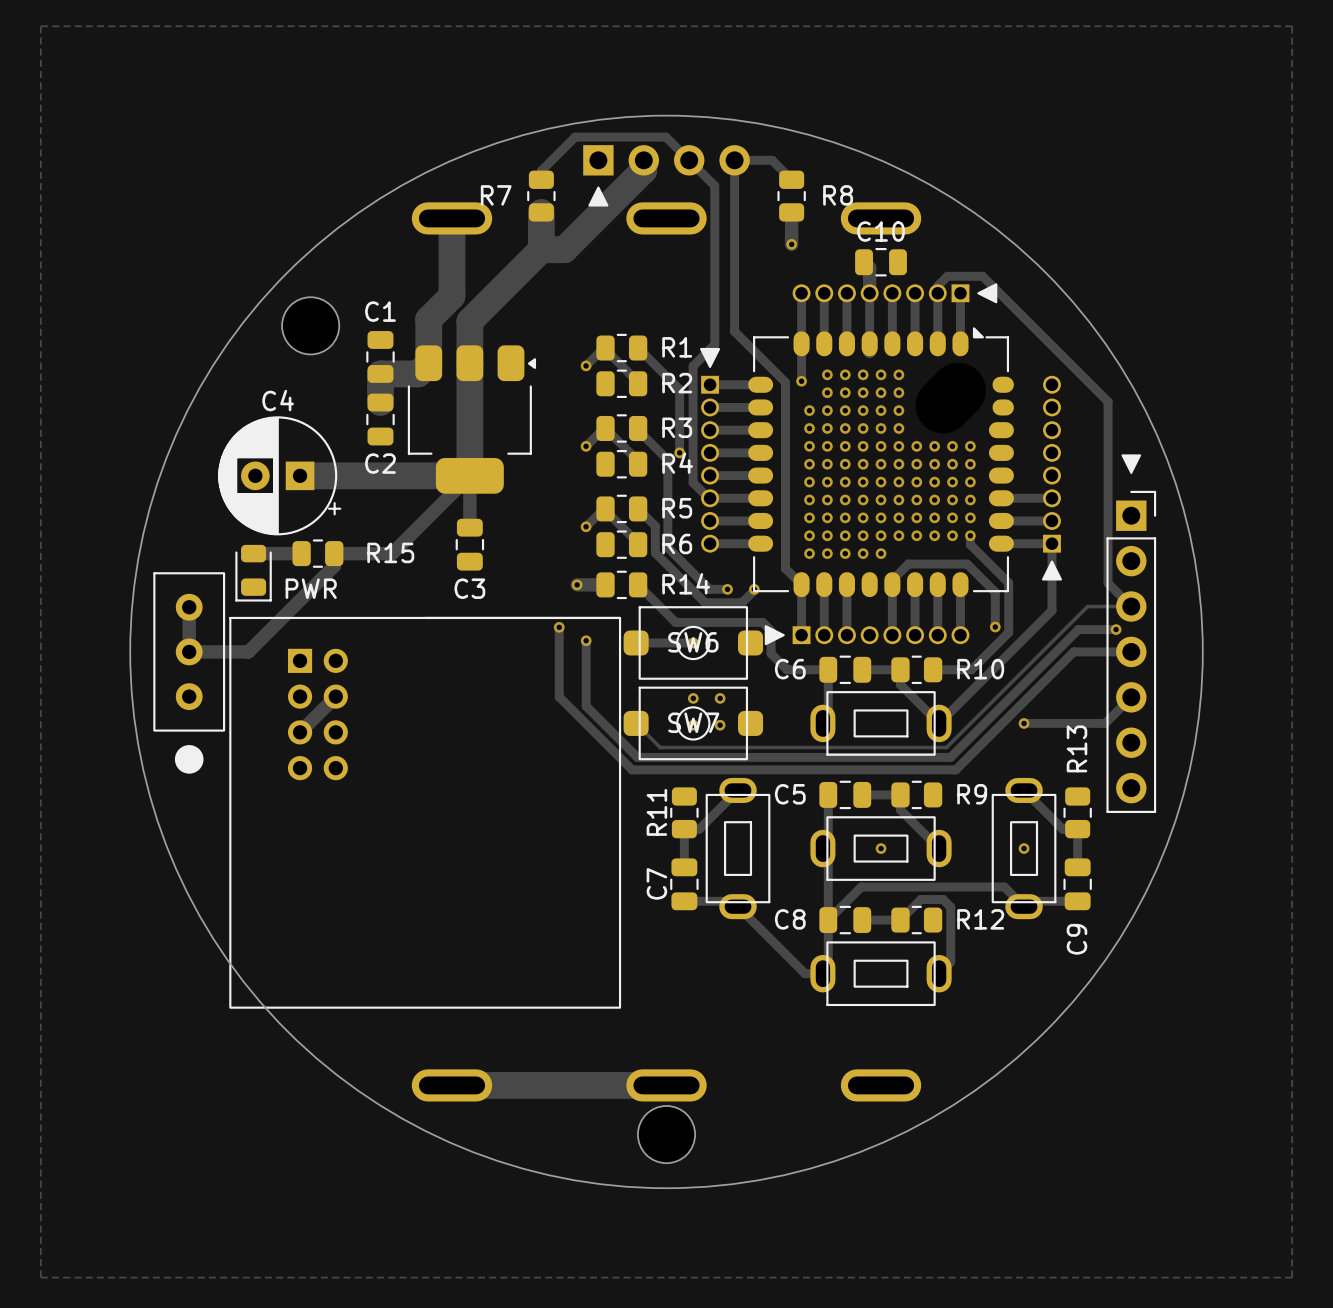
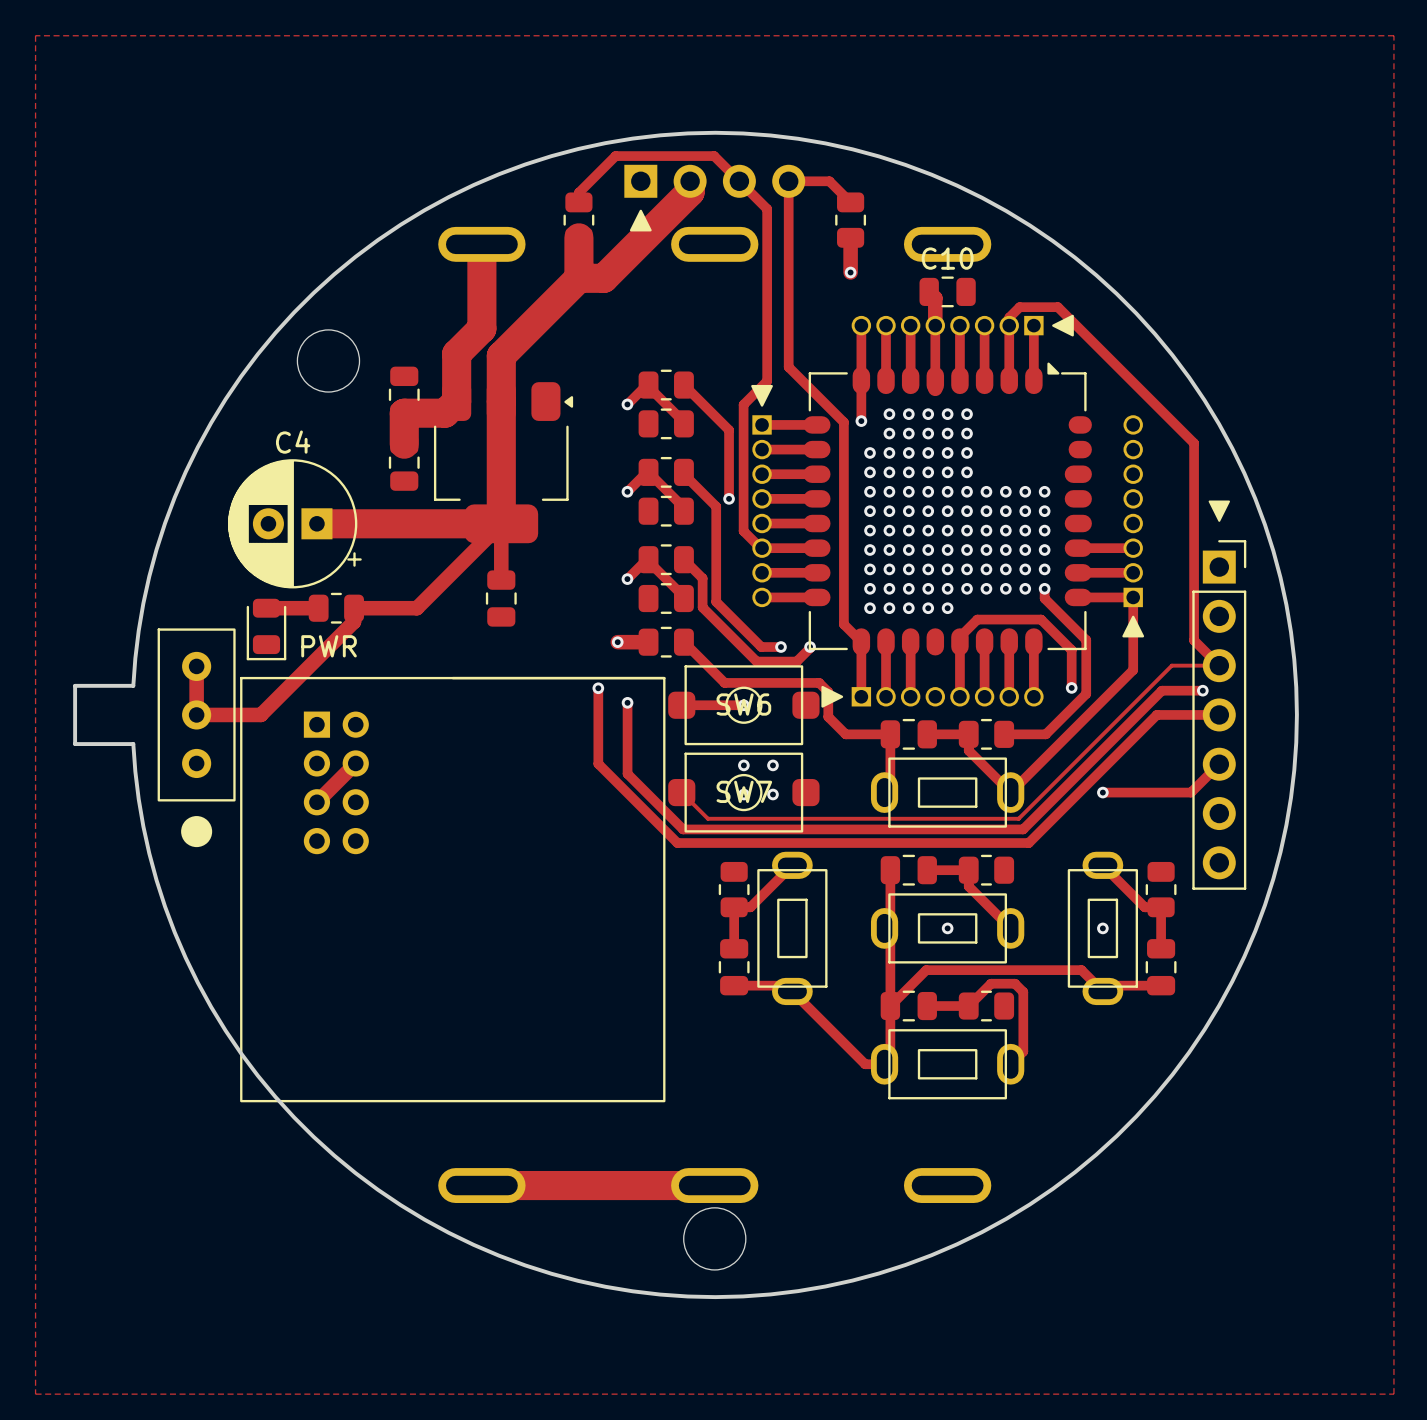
round board edge: [129, 115, 1204, 1189] -> none
R7 name: R7 (496, 195) -> none
R8 name: R8 (838, 195) -> none
C1 name: C1 (380, 311) -> none
R1 name: R1 (677, 347) -> none
R2 name: R2 (677, 383) -> none
R3 name: R3 (677, 427) -> none
C2 name: C2 (380, 463) -> none
R4 name: R4 (677, 463) -> none
R5 name: R5 (677, 508) -> none
R6 name: R6 (677, 544) -> none
R15 name: R15 (390, 552) -> none
R14 name: R14 (686, 583) -> none
C3 name: C3 (469, 588) -> none
board edge: none -> (75, 685) (75, 744) (133, 744) (138, 799) (149, 853) (165, 906) (185, 957) (211, 1007) (241, 1053) (294, 1117) (334, 1155) (377, 1189) (424, 1219) (473, 1244) (525, 1265) (578, 1280) (632, 1291) (687, 1296) (743, 1296) (798, 1291) (852, 1280) (905, 1264) (957, 1244) (1006, 1218) (1052, 1188) (1096, 1154) (1136, 1116) (1172, 1074) (1204, 1029) (1232, 981) (1264, 905) (1280, 852) (1291, 797) (1296, 742) (1296, 687) (1291, 632) (1280, 577) (1264, 524) (1244, 473) (1219, 424) (1189, 377) (1154, 333) (1116, 293) (1074, 257) (1029, 225) (957, 185) (905, 164) (852, 149) (798, 138) (743, 133) (687, 133) (632, 138) (578, 148) (525, 164) (473, 185) (424, 210) (377, 240) (334, 274) (294, 312) (257, 354) (225, 399) (185, 471) (165, 523) (149, 576) (138, 630) (133, 685) (75, 685)
C6 name: C6 (790, 669) -> none
R10 name: R10 (980, 669) -> none
R13 name: R13 (1076, 748) -> none
C5 name: C5 (790, 794) -> none
R9 name: R9 (972, 794) -> none
R11 name: R11 (656, 812) -> none
C7 name: C7 (656, 883) -> none
C8 name: C8 (790, 919) -> none
R12 name: R12 (980, 919) -> none
C9 name: C9 (1076, 939) -> none

